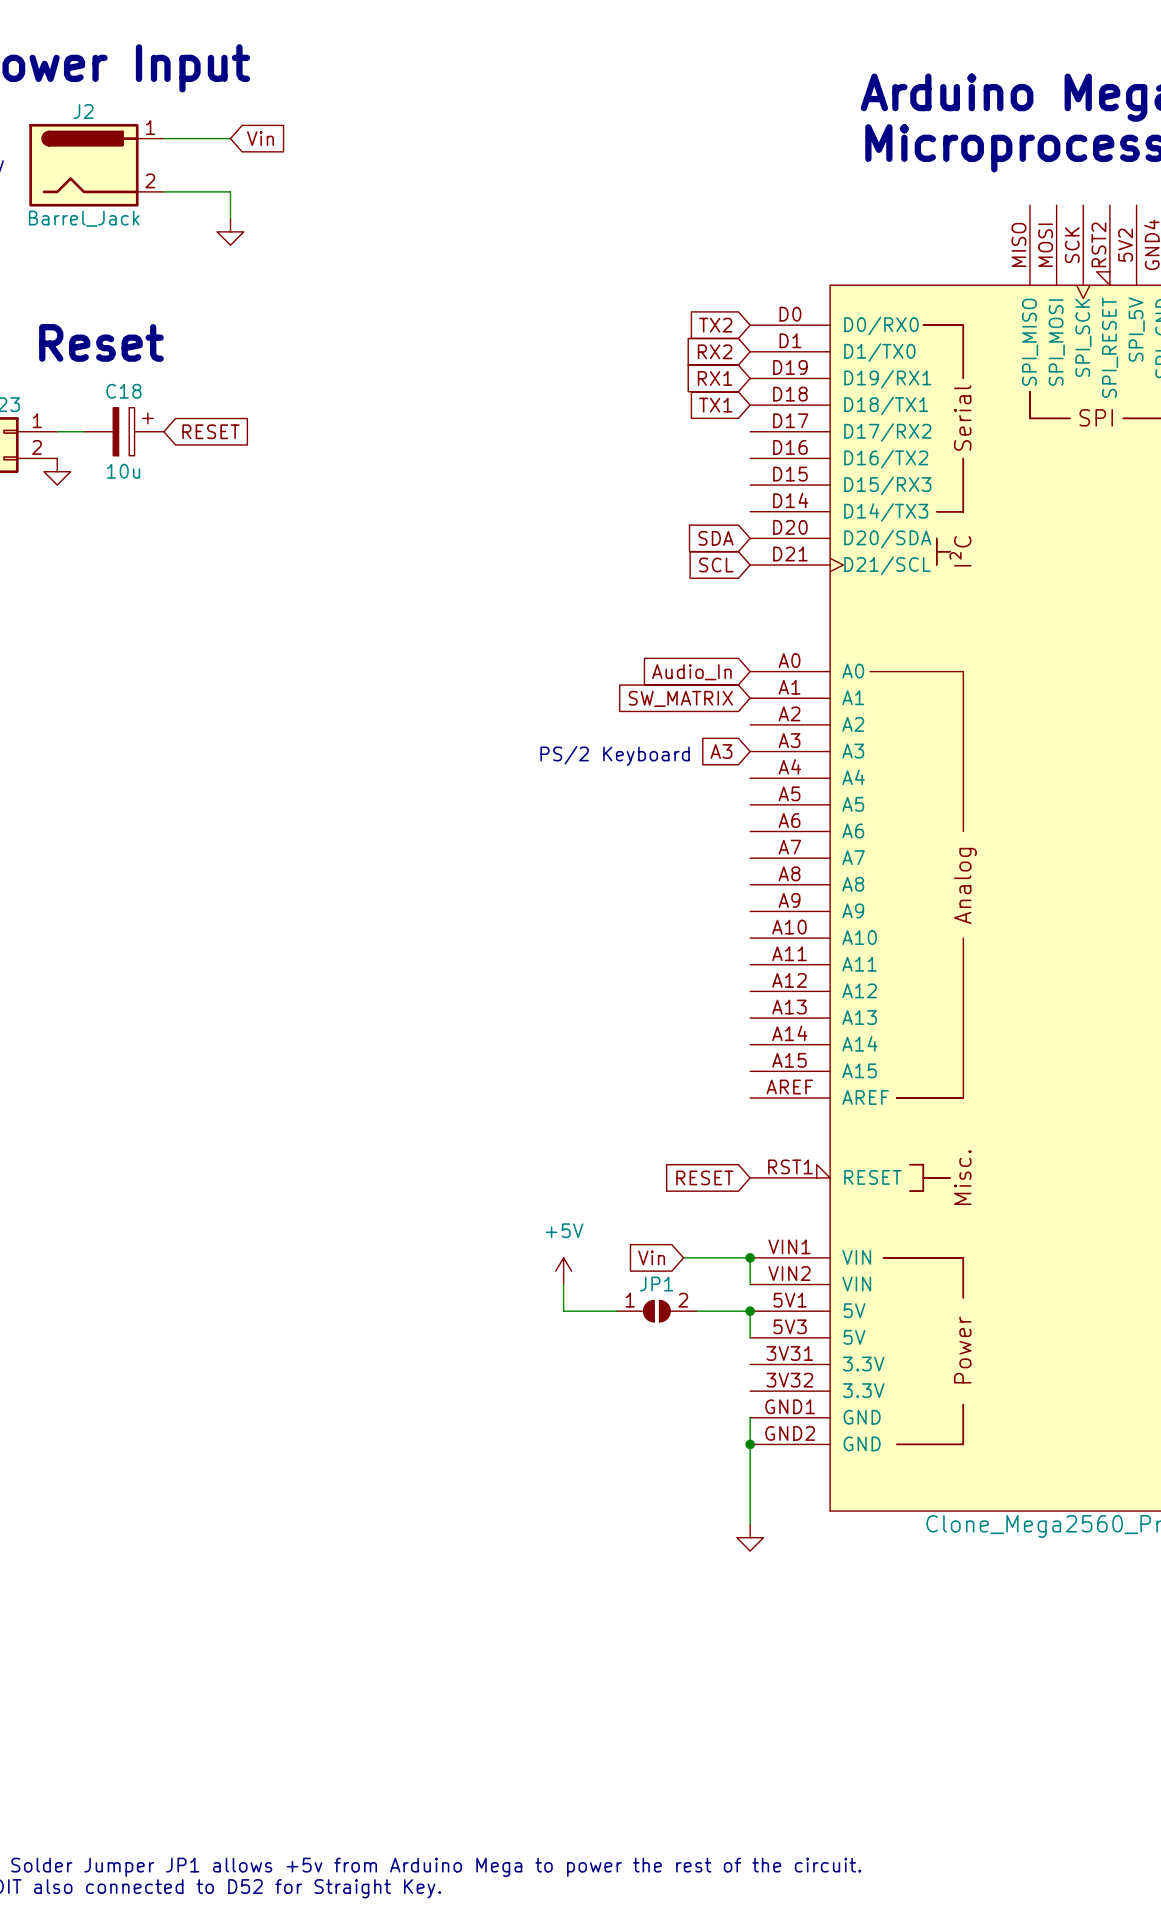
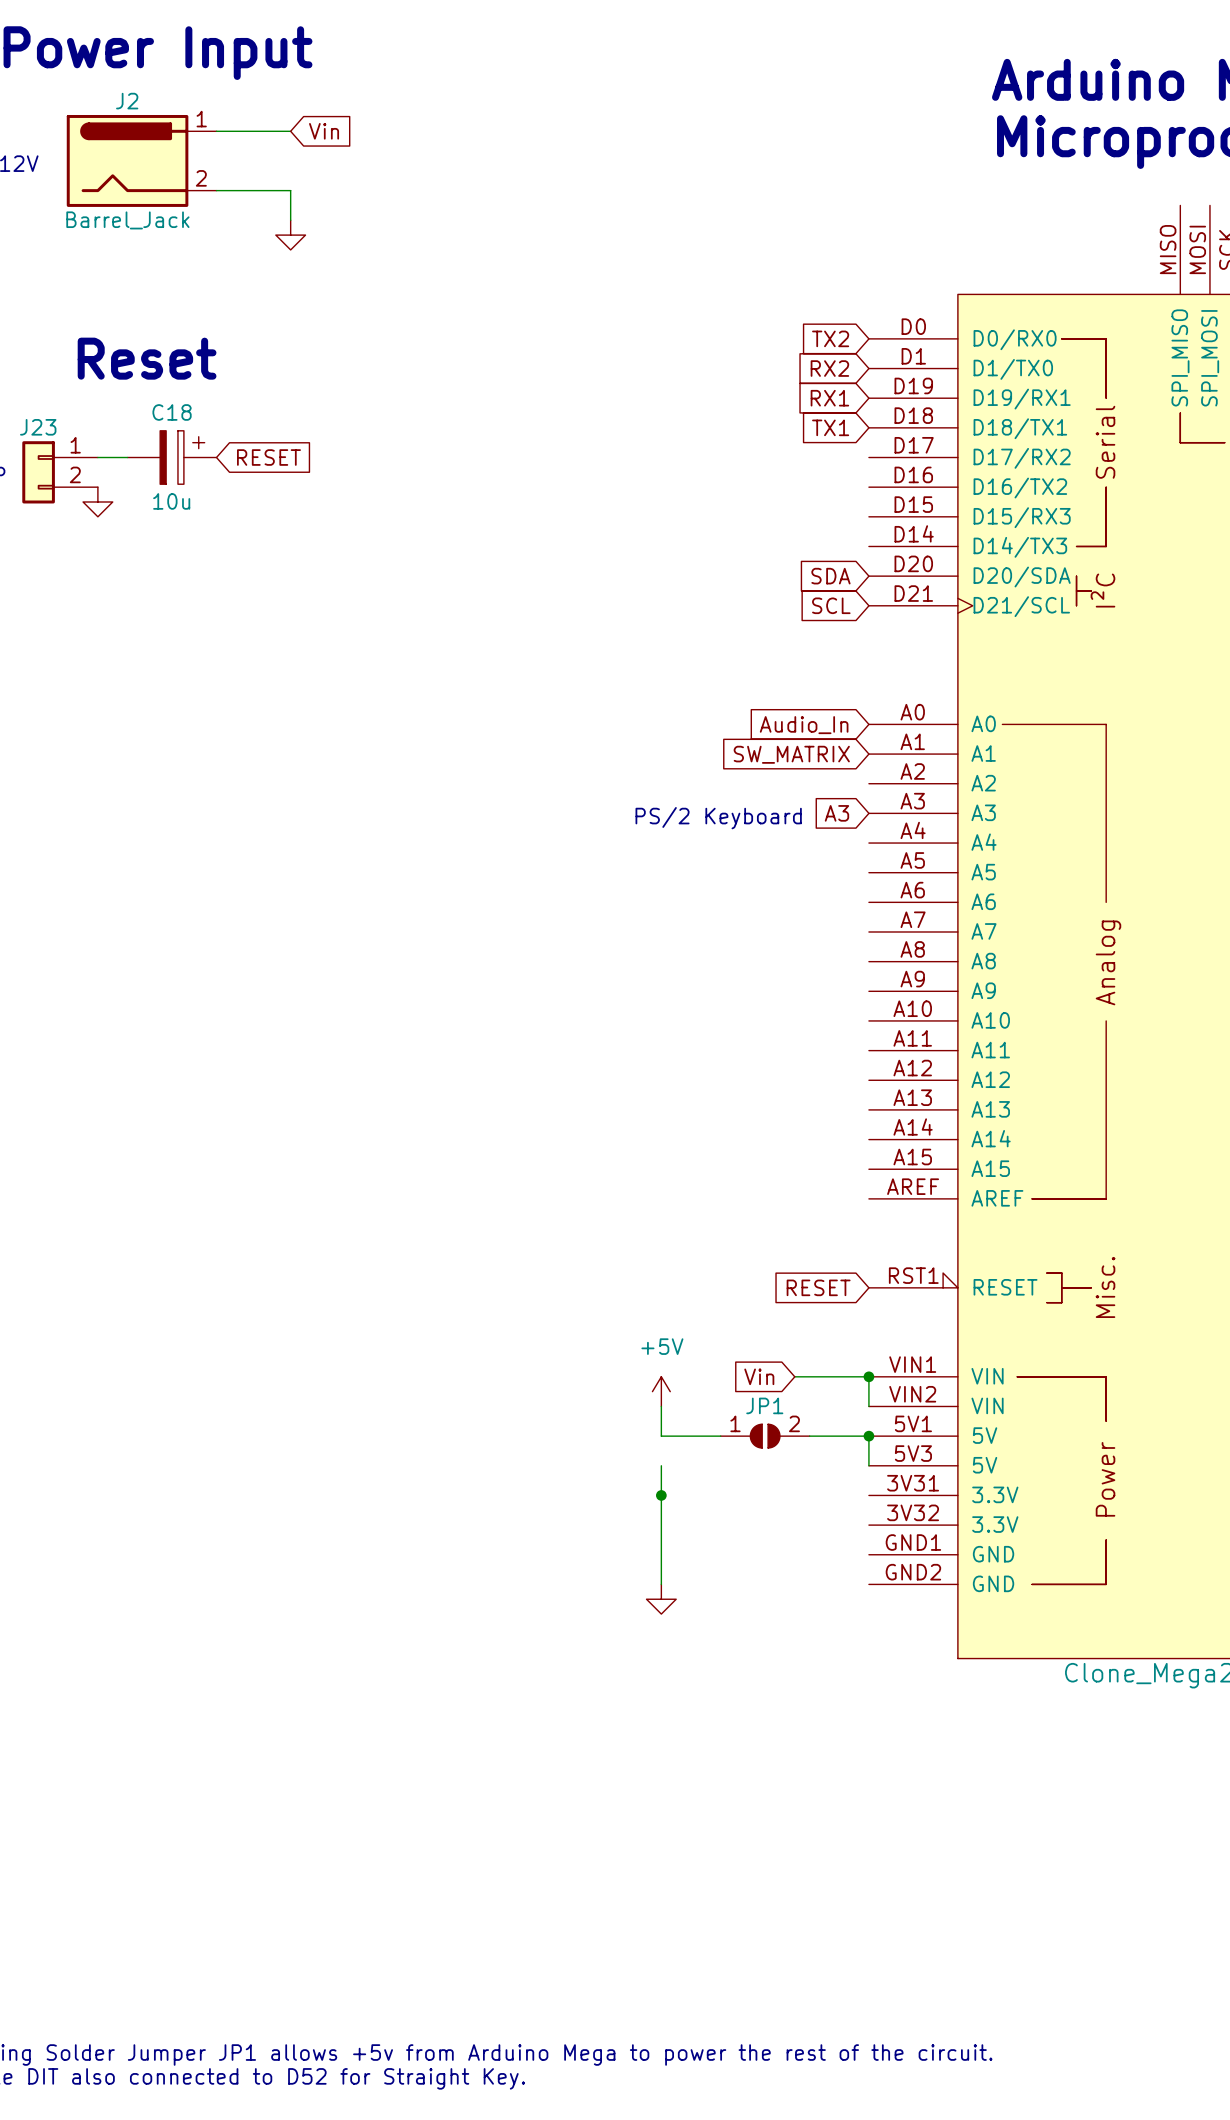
junction: none -> (661, 1495)
wire: (750, 1417) (750, 1524) -> (661, 1465) (661, 1584)
junction: (750, 1444) -> none
power symbol position: (750, 1537) -> (661, 1599)

